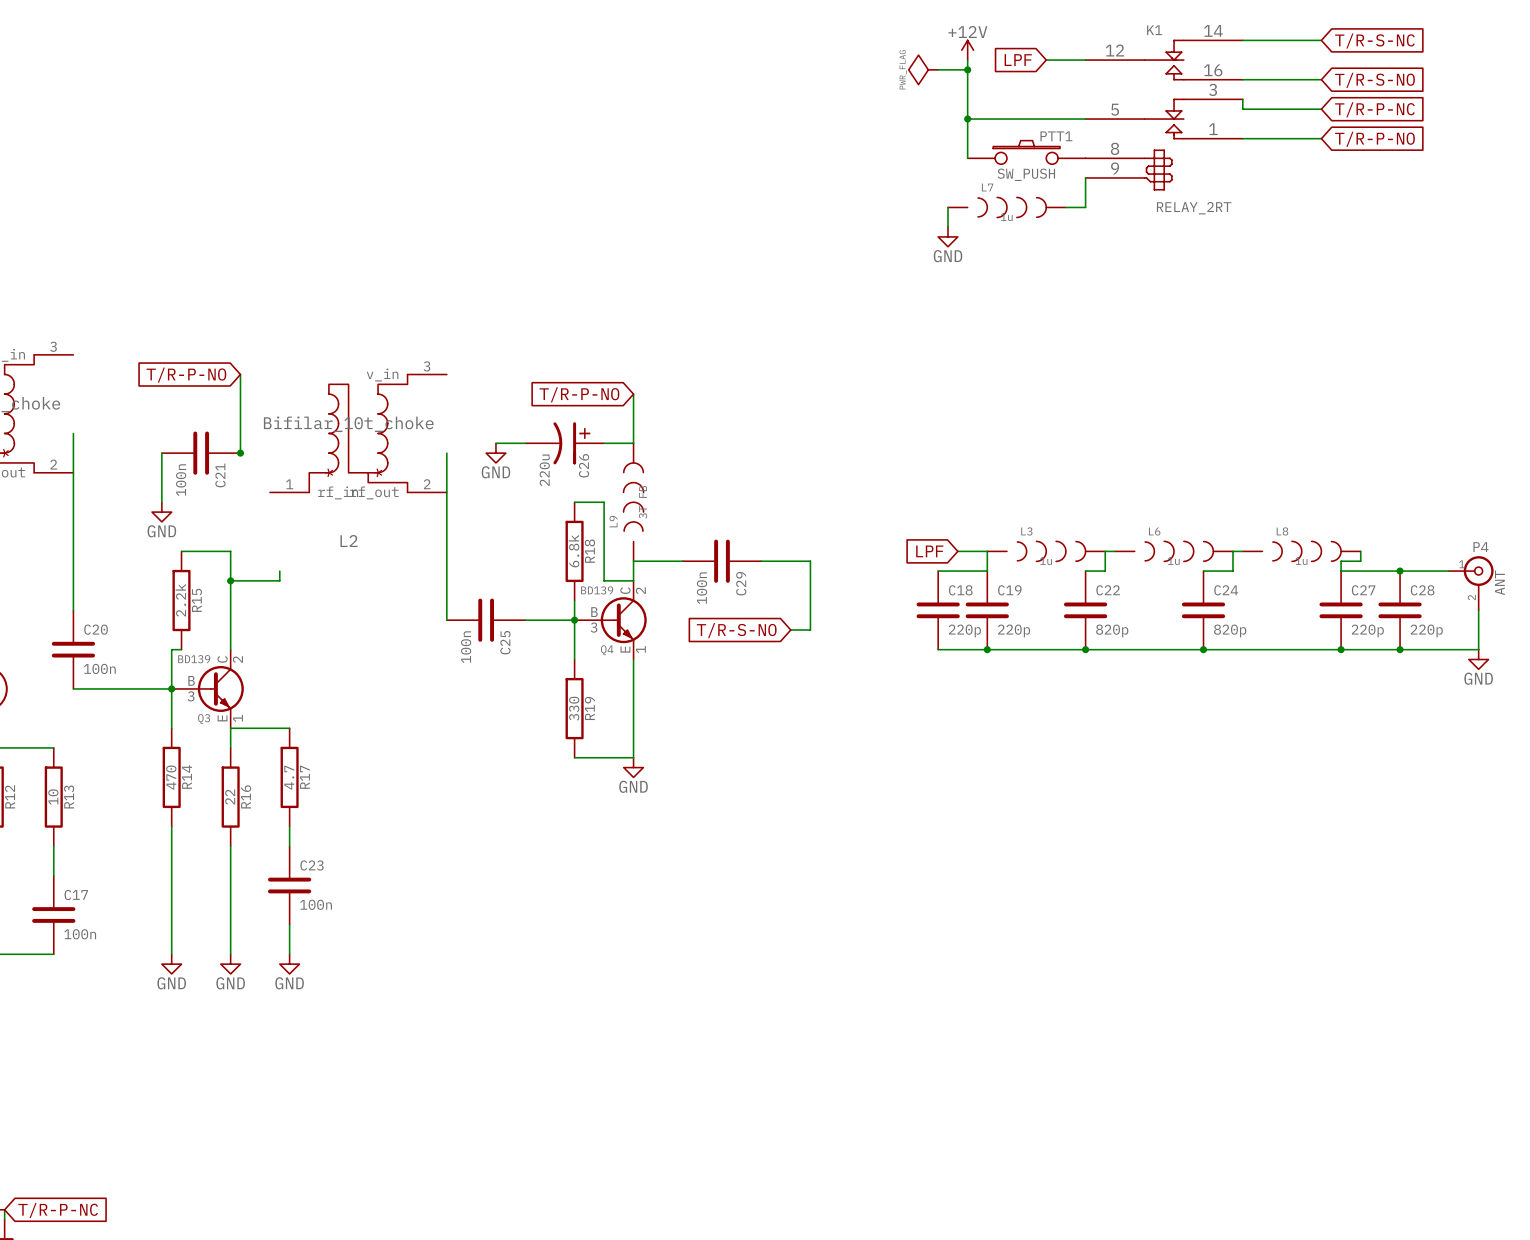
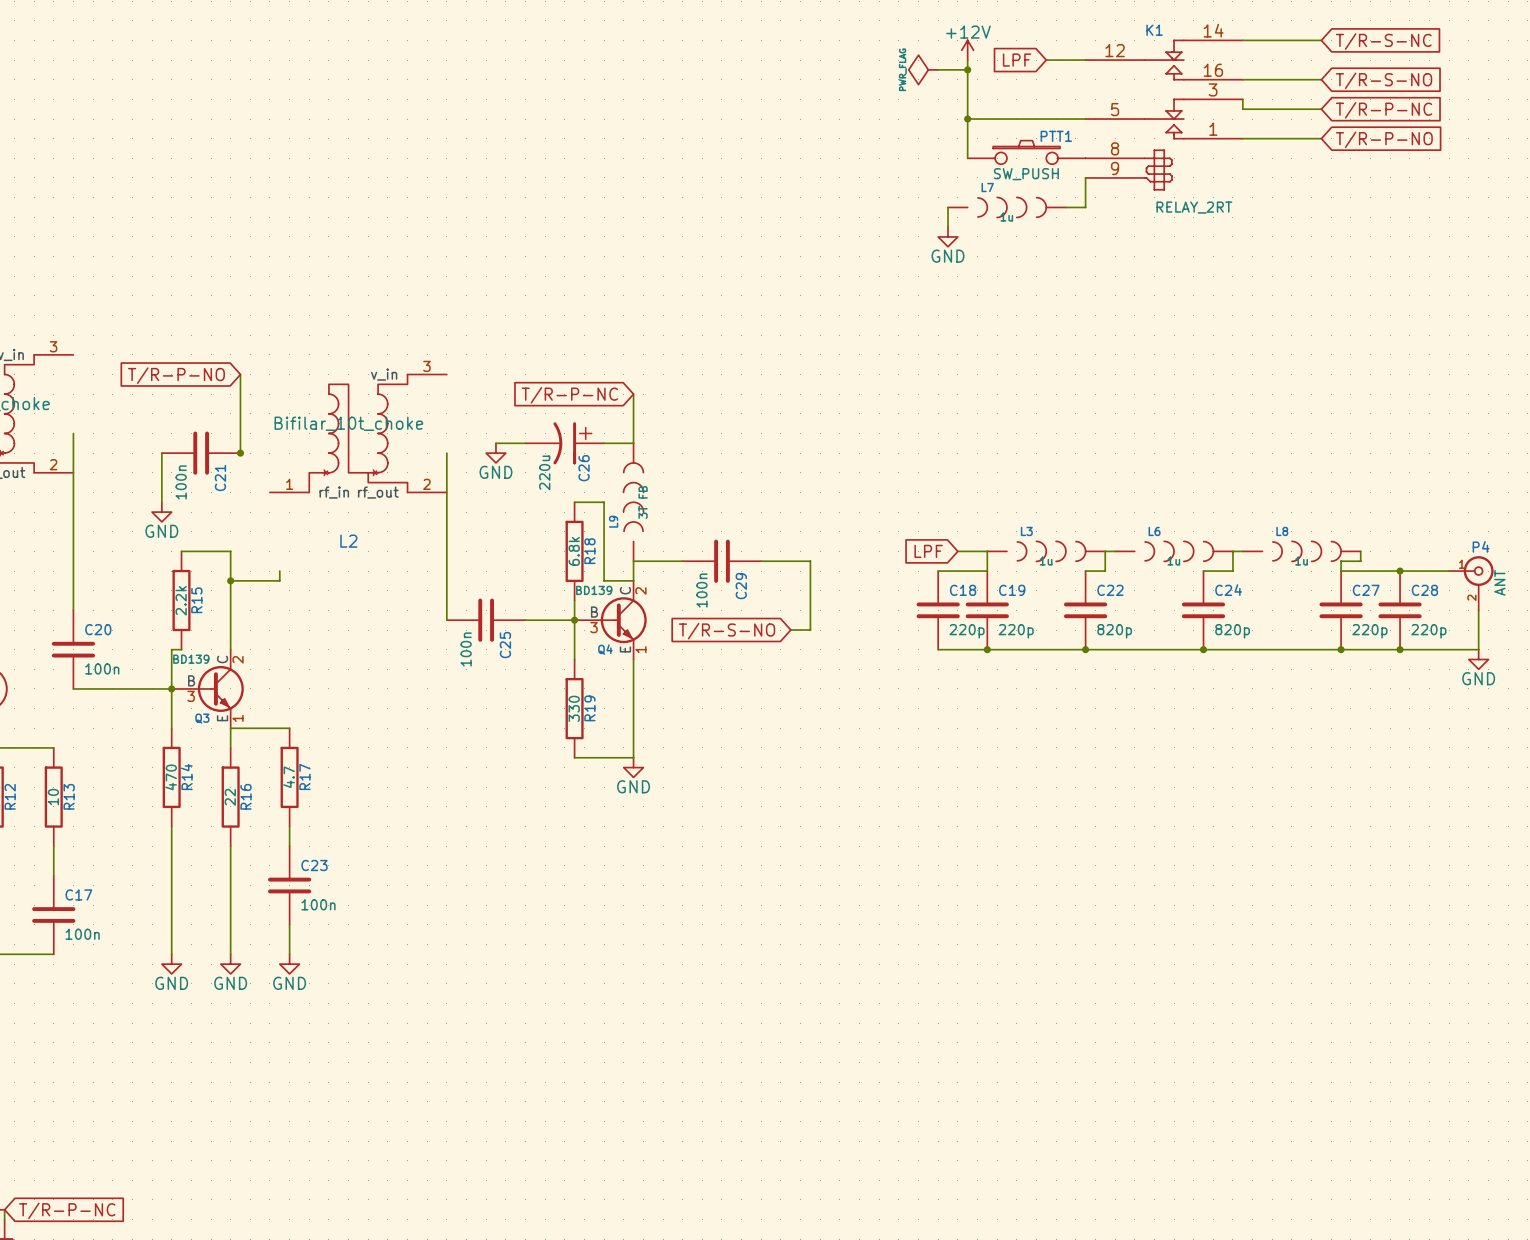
global label: T/R-P-NO (579, 394) -> T/R-P-NC (569, 395)

